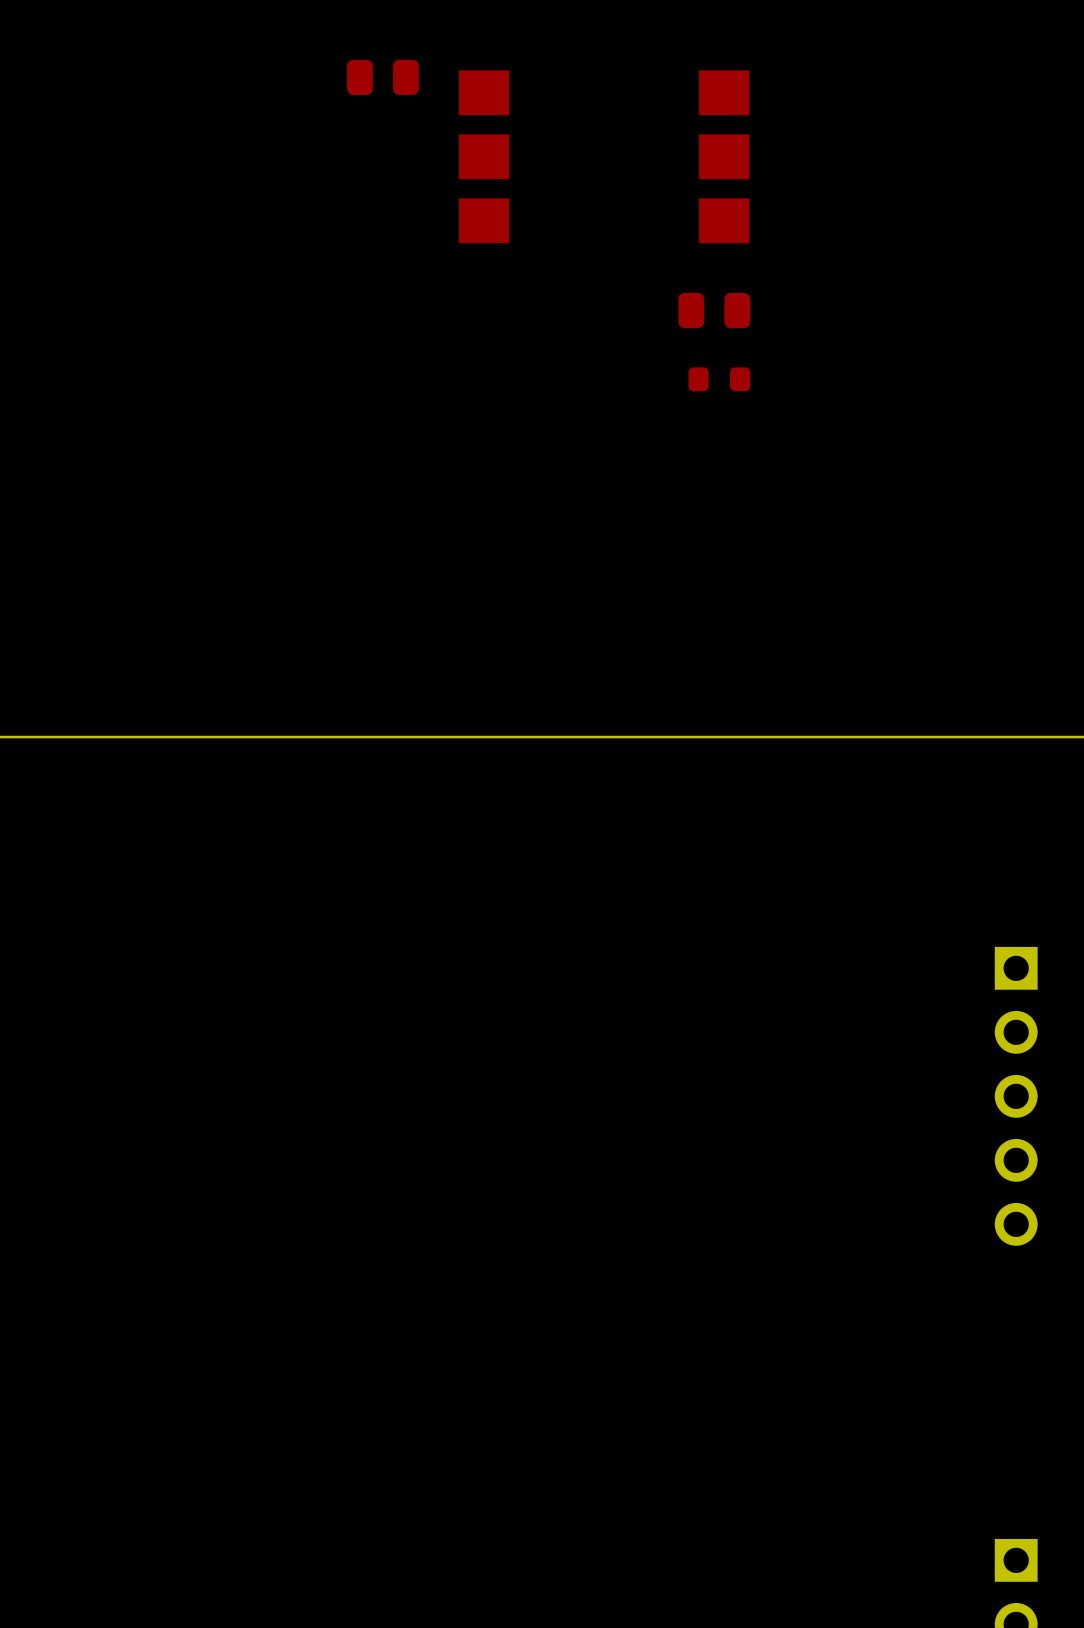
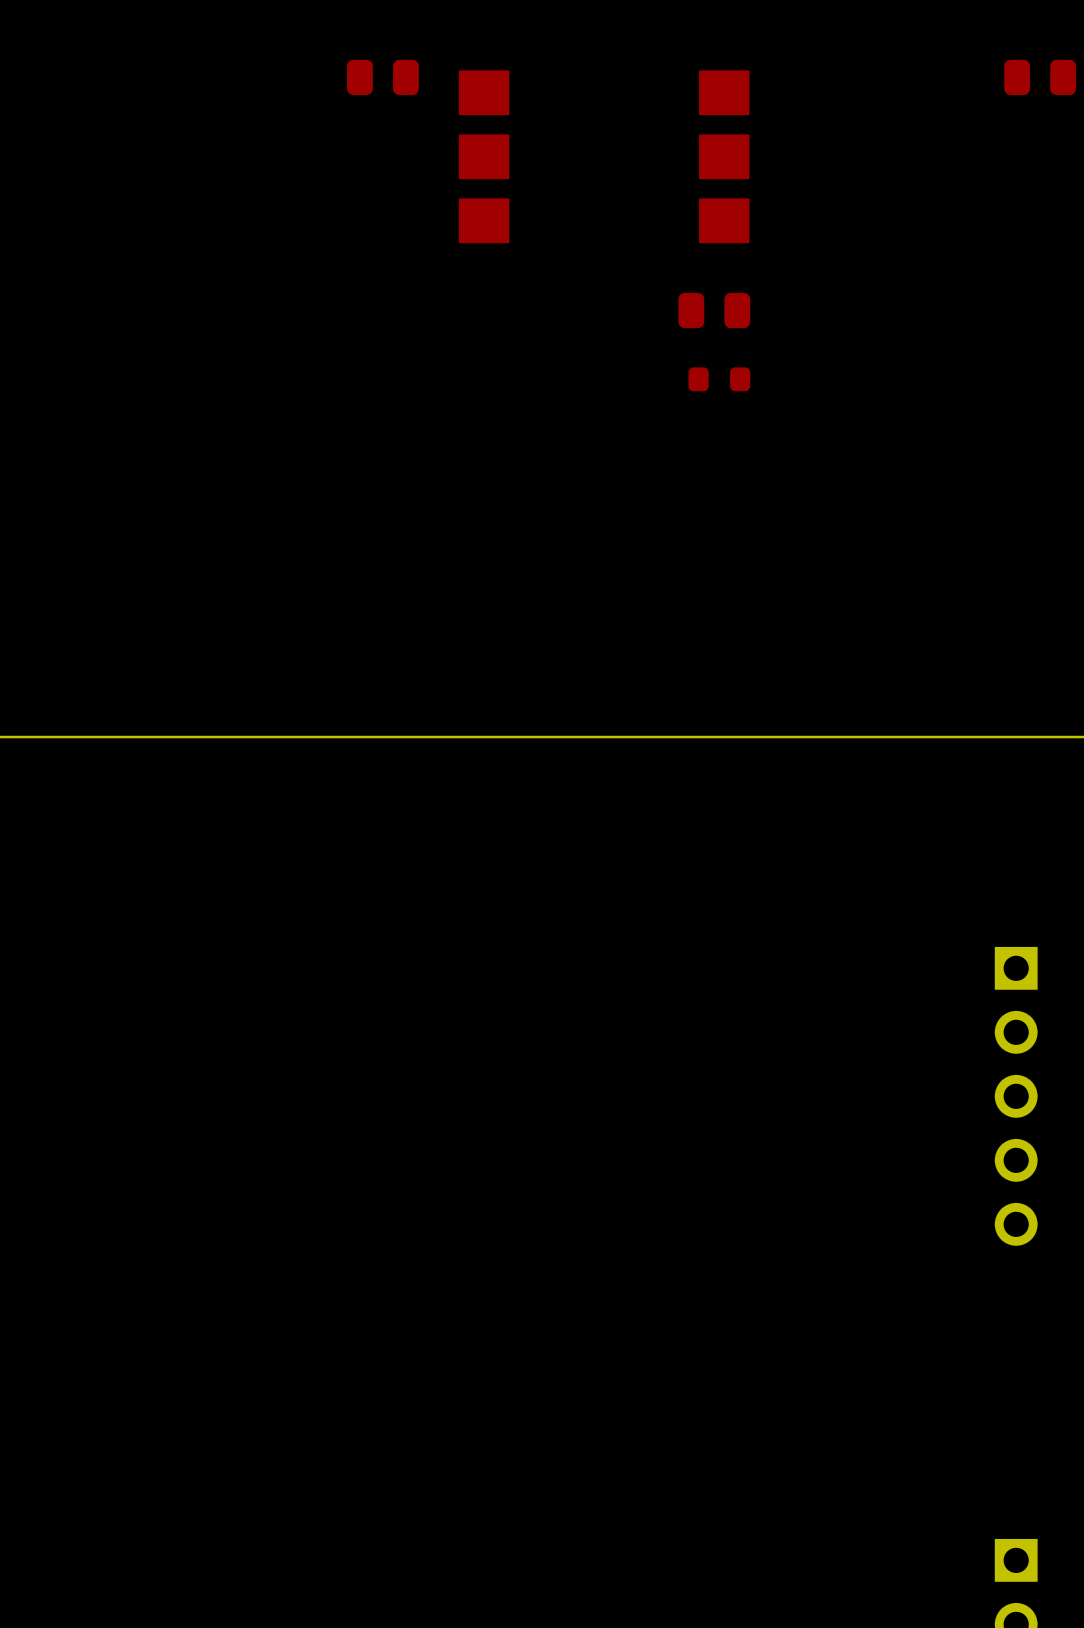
part: none -> (1040, 77)

